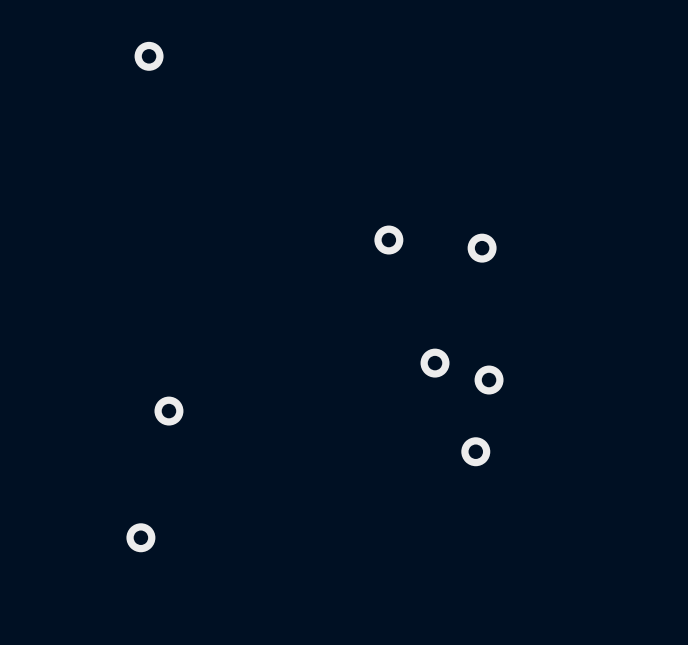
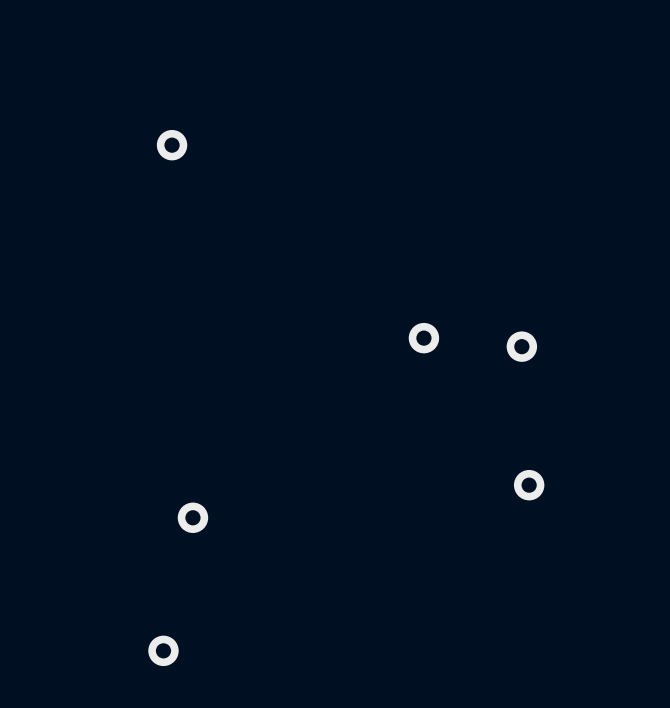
via: (435, 363) -> none
via: (475, 451) -> none

